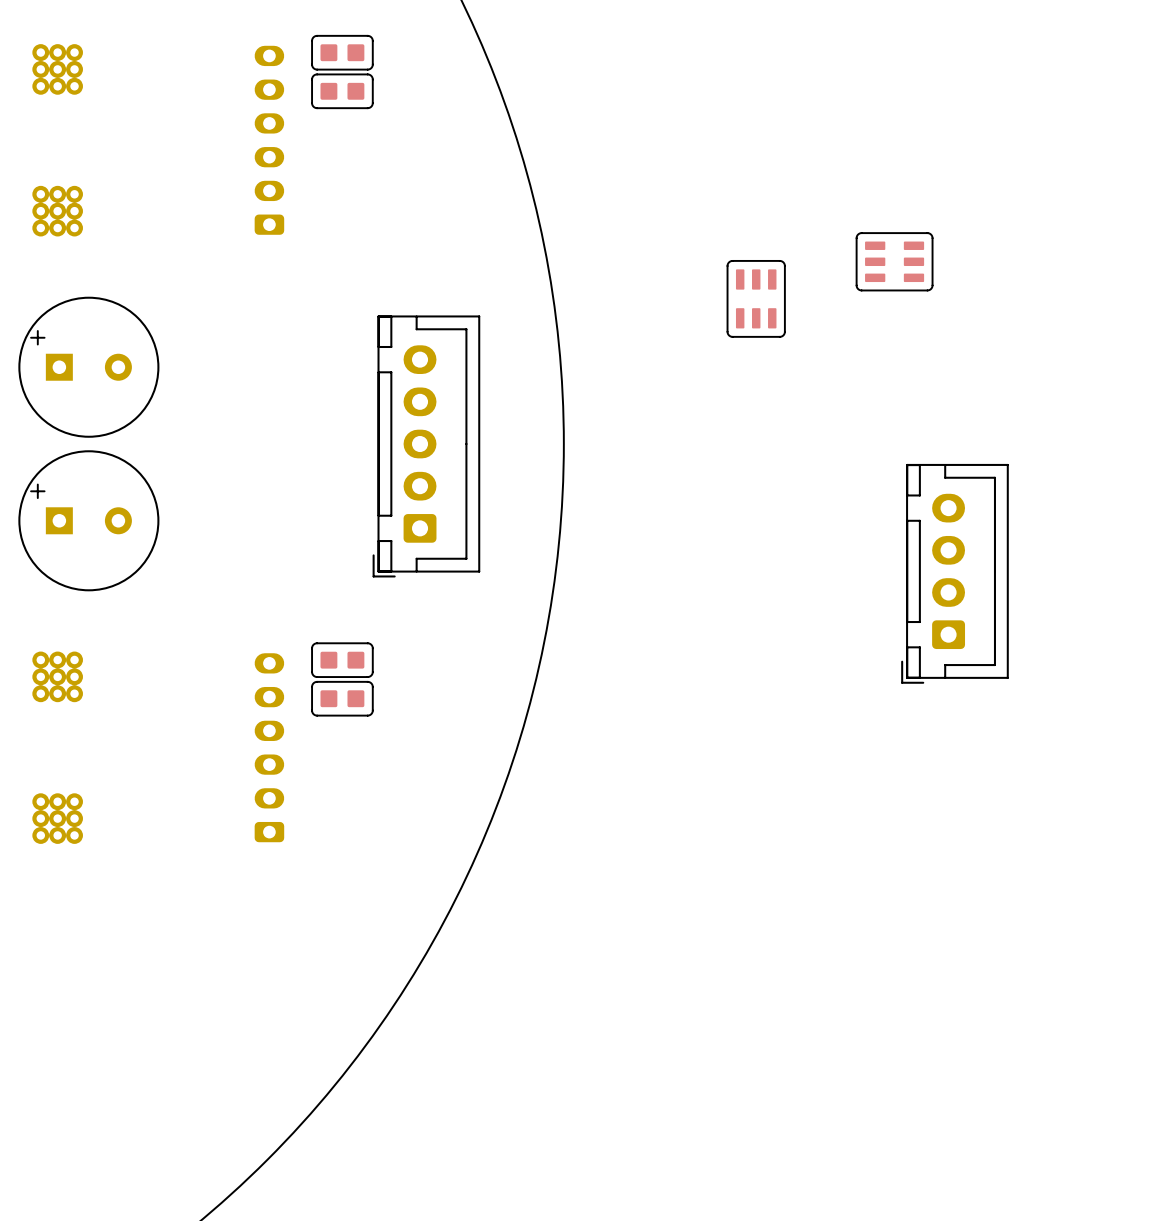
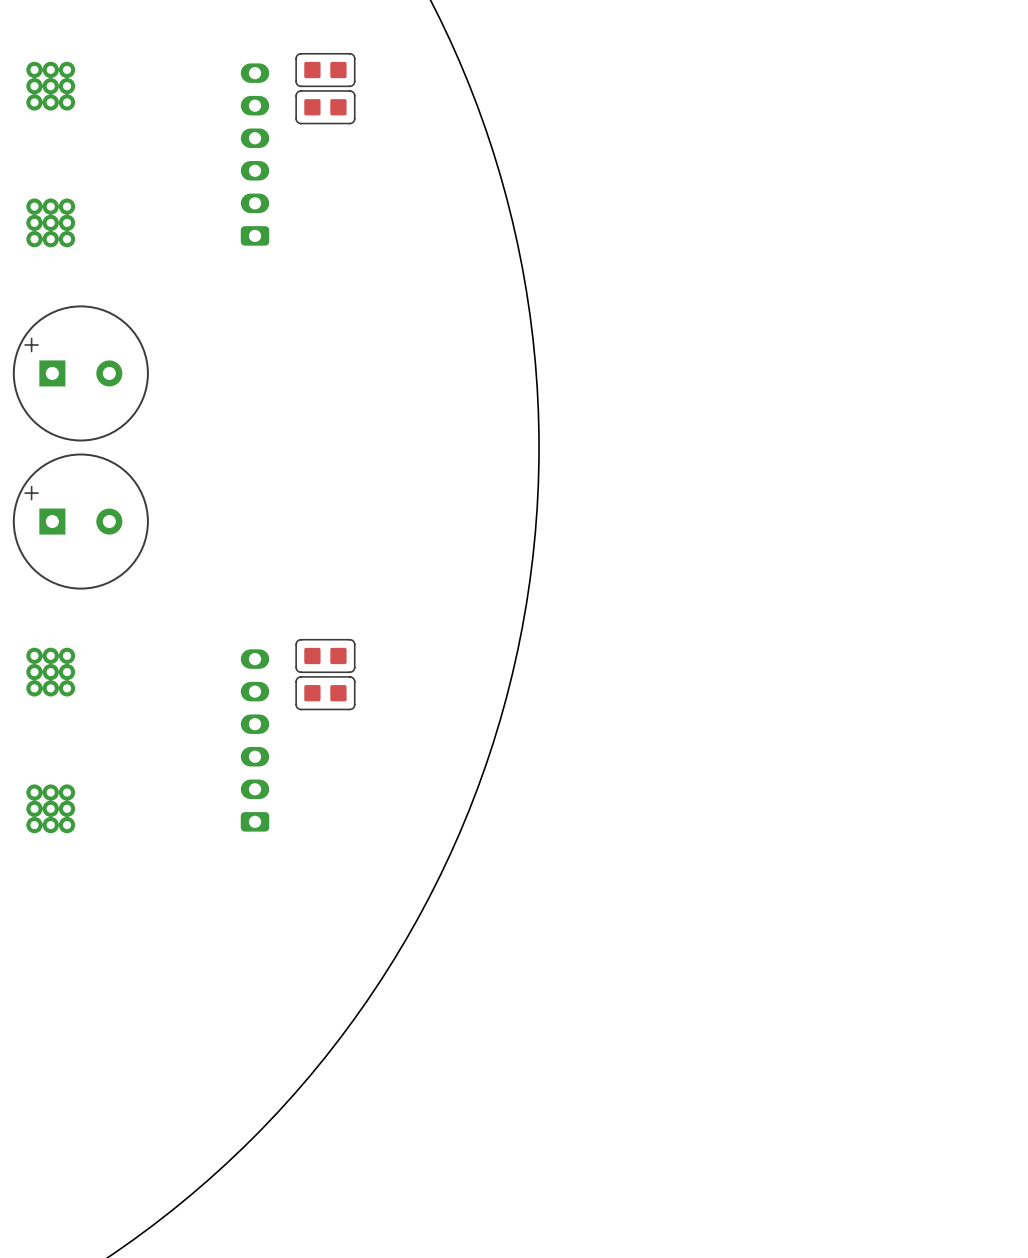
part: (894, 261) -> none
part: (756, 298) -> none
part: (426, 446) -> none
part: (954, 573) -> none

